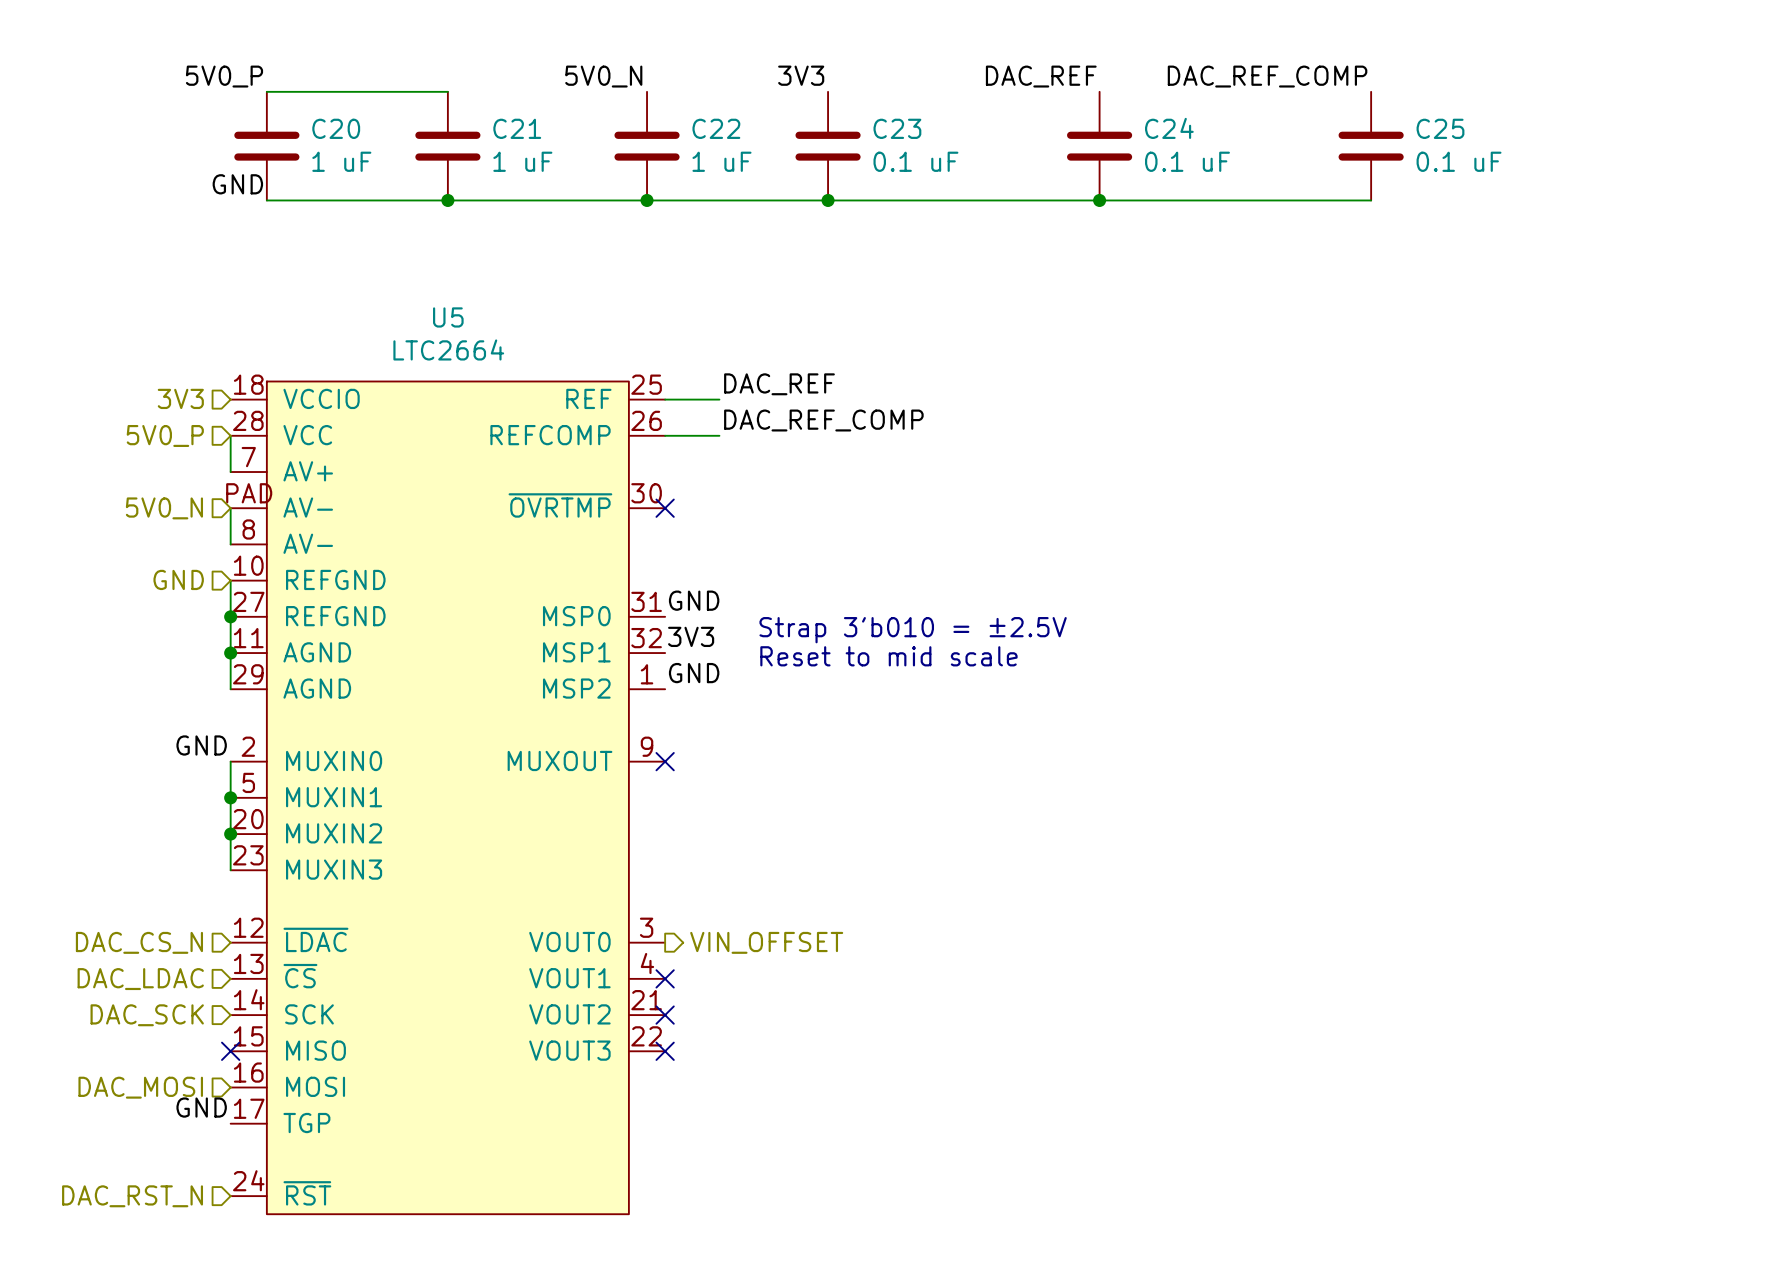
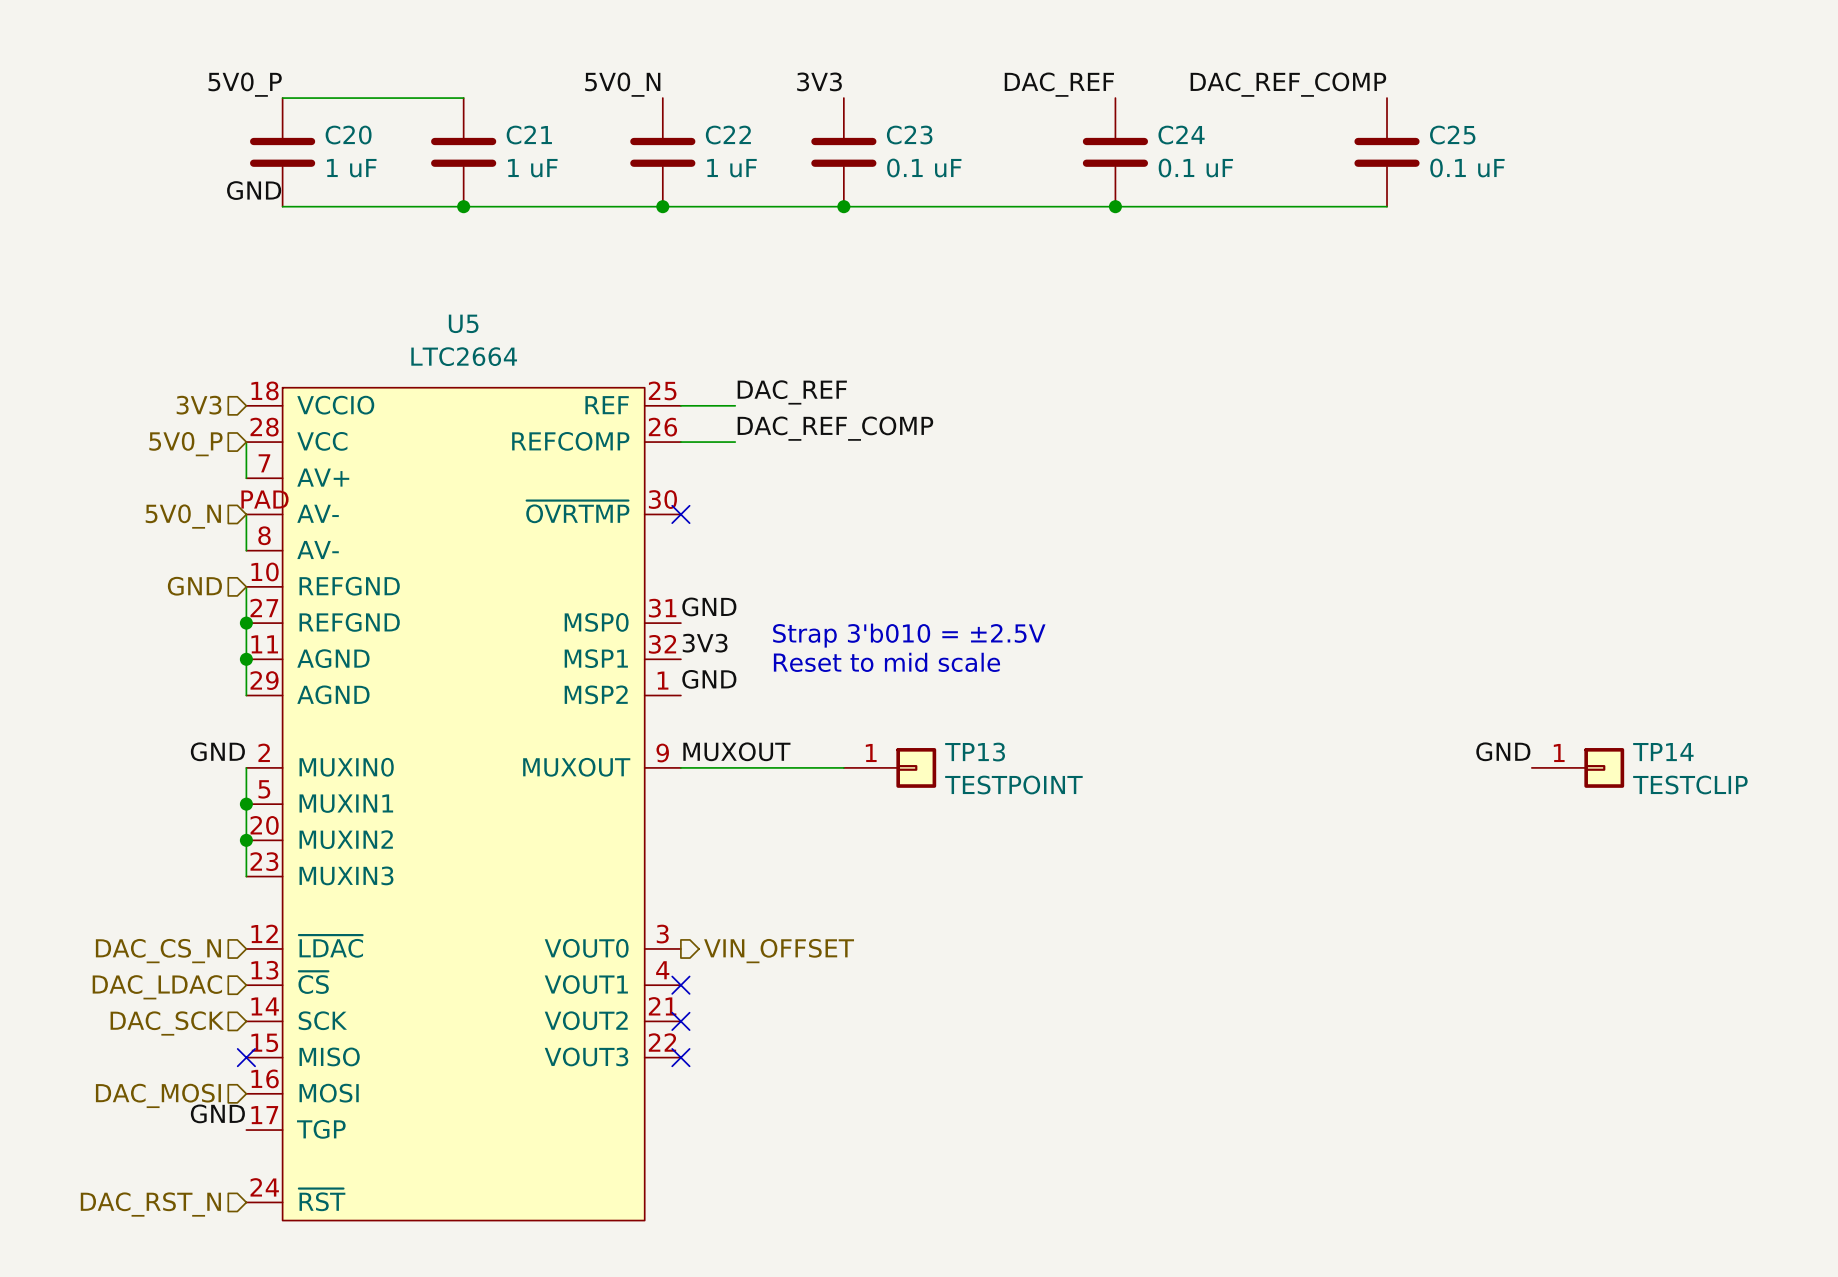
label: none -> MUXOUT (736, 751)
label: none -> GND (1503, 751)
wire: none -> (680, 767) (843, 767)
no-connect mark: (665, 761) -> none
TP13: none -> TESTPOINT (890, 767)
TP14: none -> TESTCLIP (1578, 767)

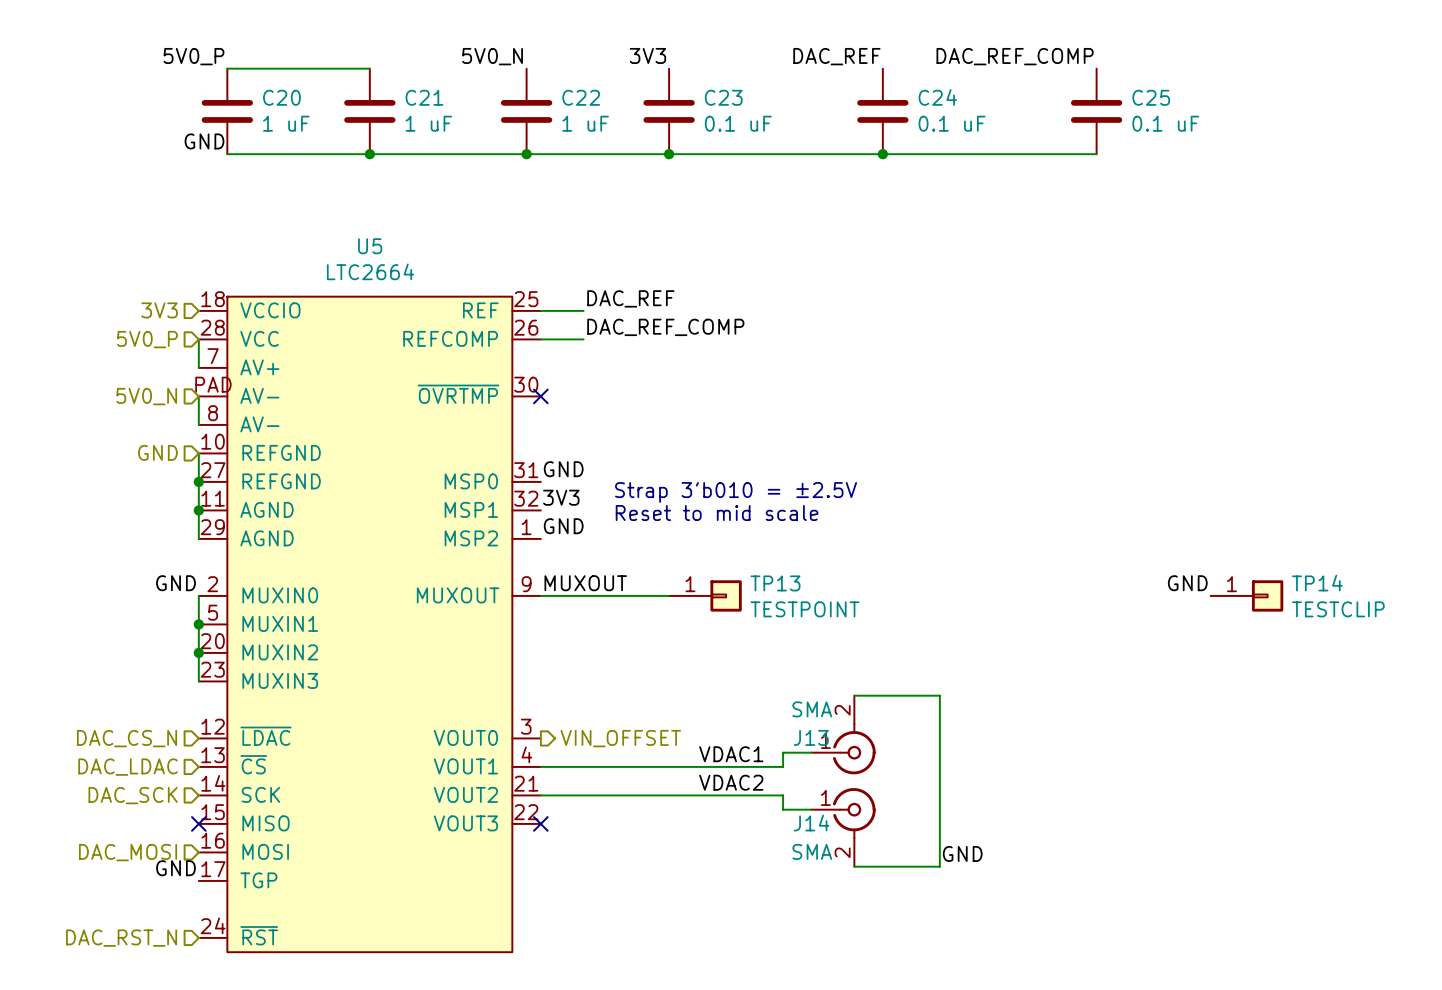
wire: none -> (854, 695) (939, 695) (939, 866) (854, 866)
J13: none -> SMA (843, 735)
wire: none -> (811, 752) (783, 752) (783, 766) (540, 766)
label: none -> VDAC1 (731, 754)
no-connect mark: (680, 985) -> none
label: none -> VDAC2 (731, 782)
wire: none -> (540, 795) (783, 795) (783, 809) (811, 809)
no-connect mark: (680, 1021) -> none
J14: none -> SMA (843, 827)
label: none -> GND (962, 853)

